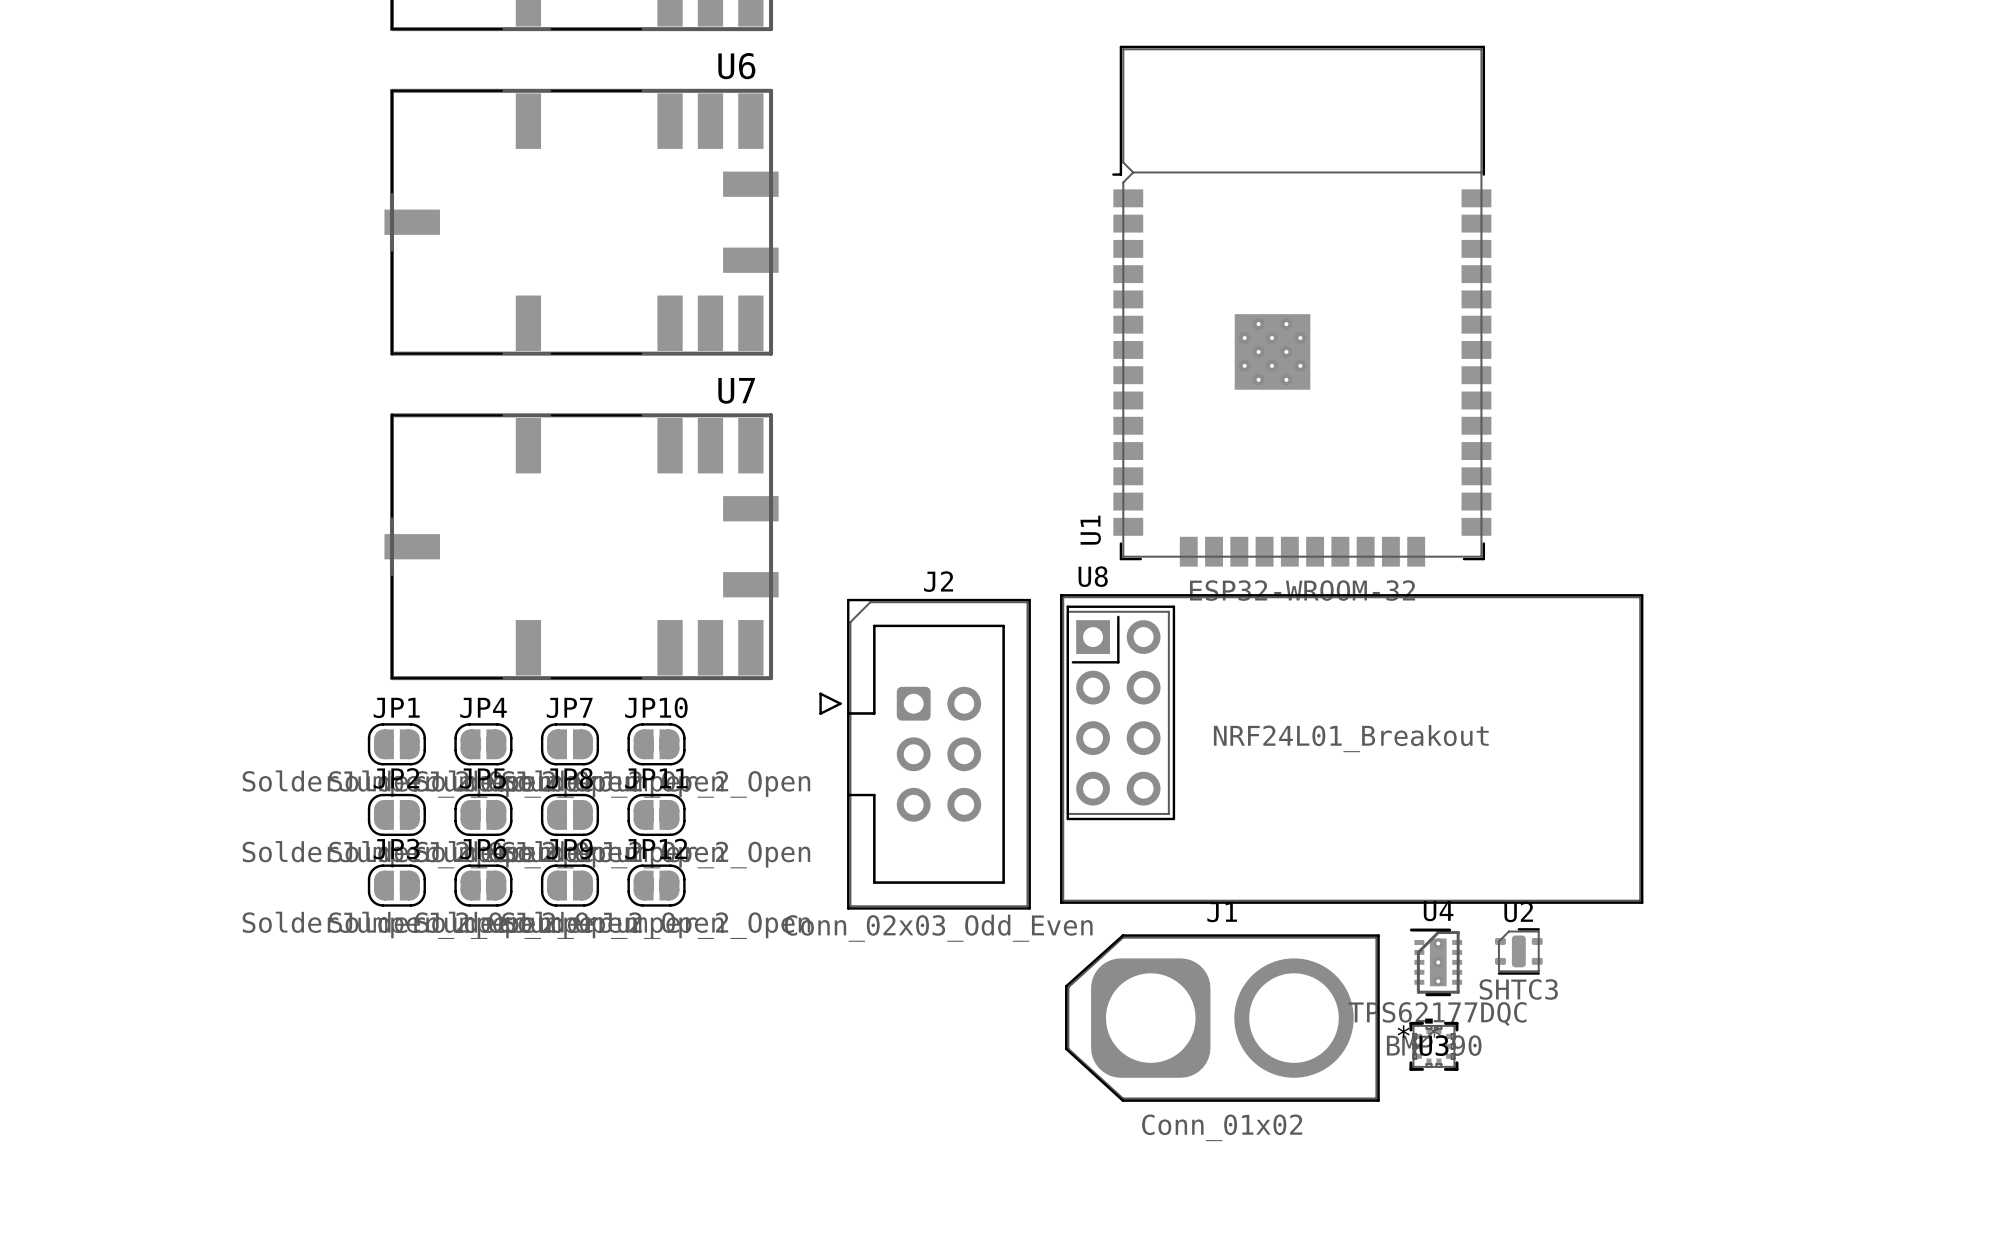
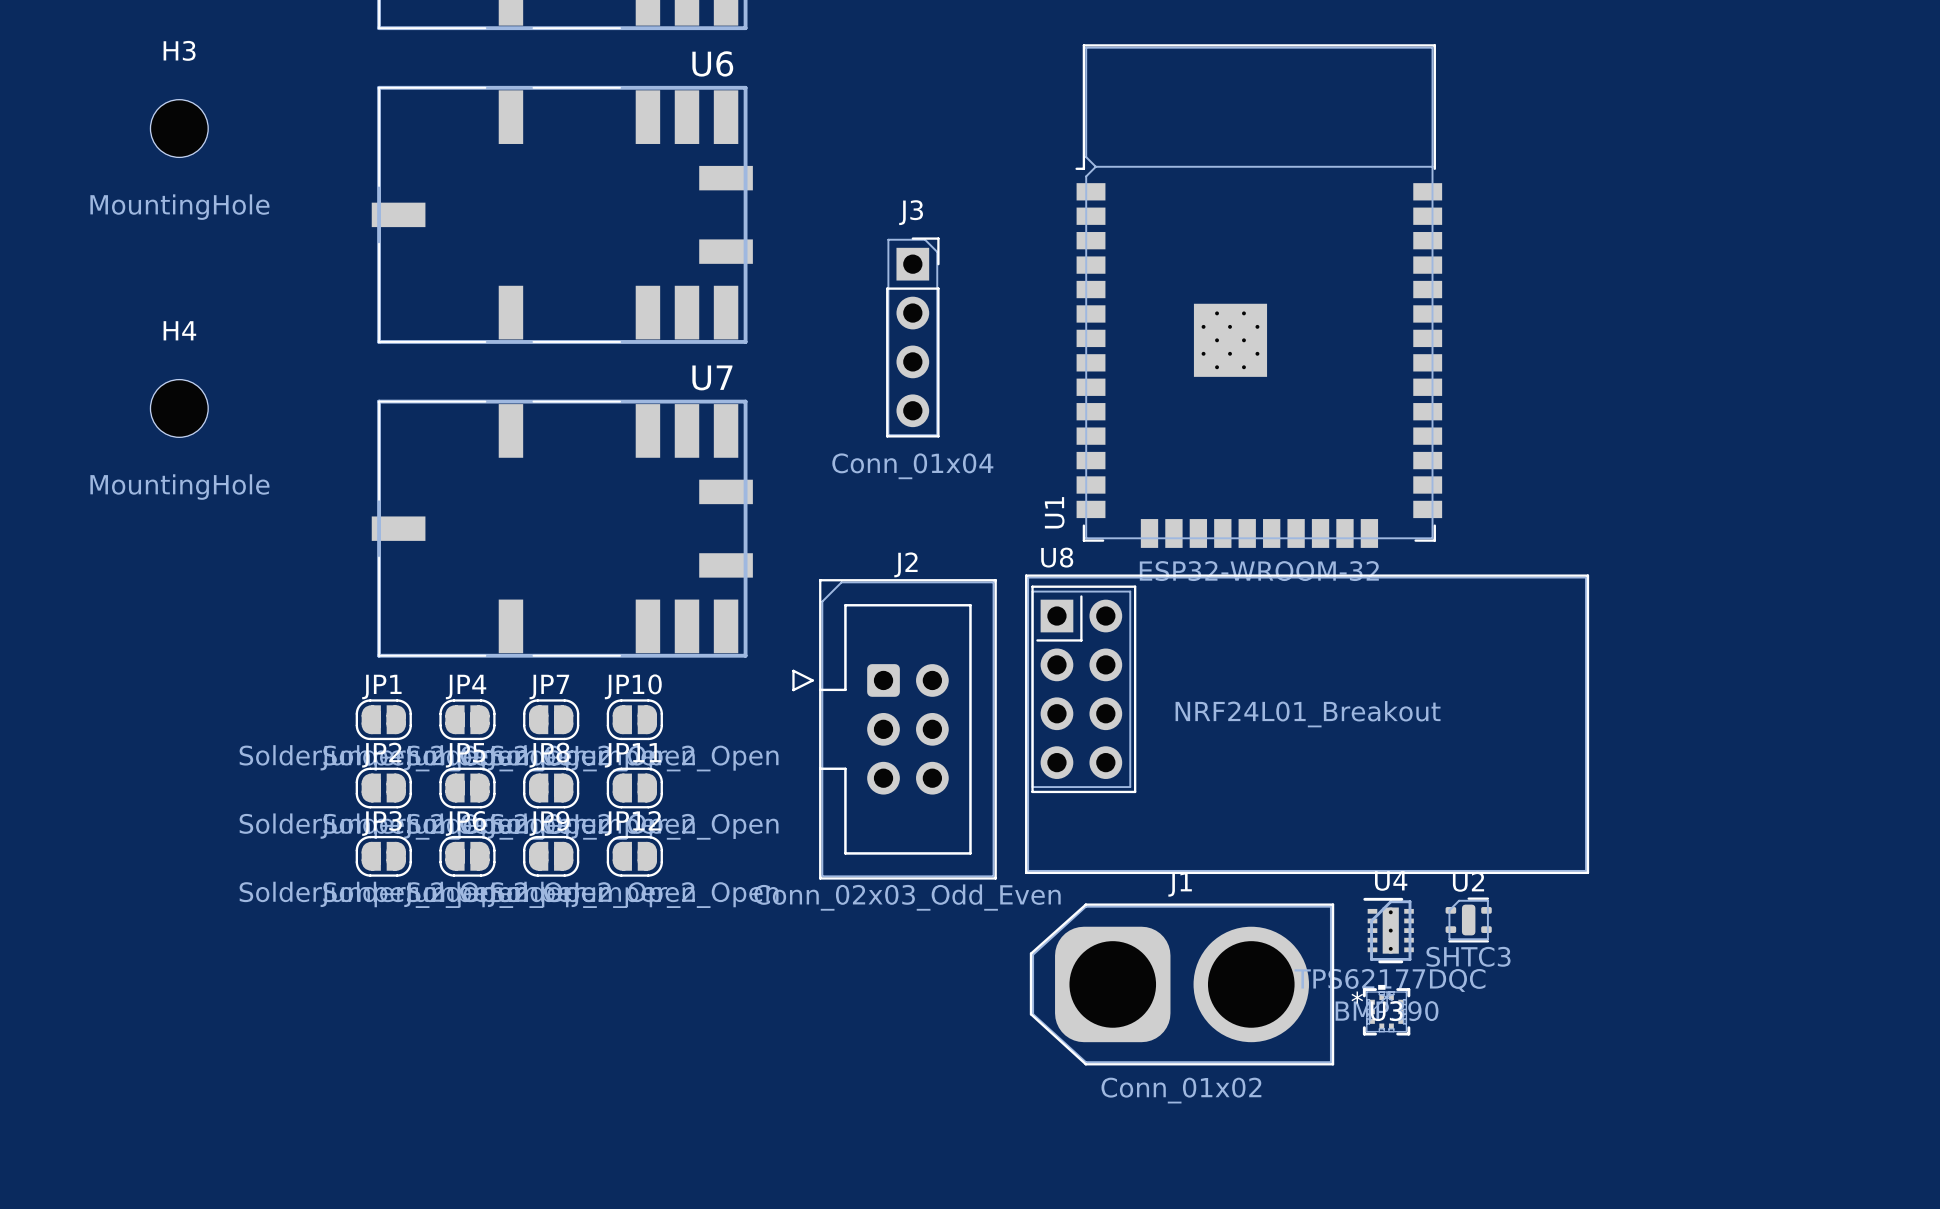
H3: none -> MountingHole (179, 128)
J3: none -> Conn_01x04 (912, 337)
H4: none -> MountingHole (179, 408)

